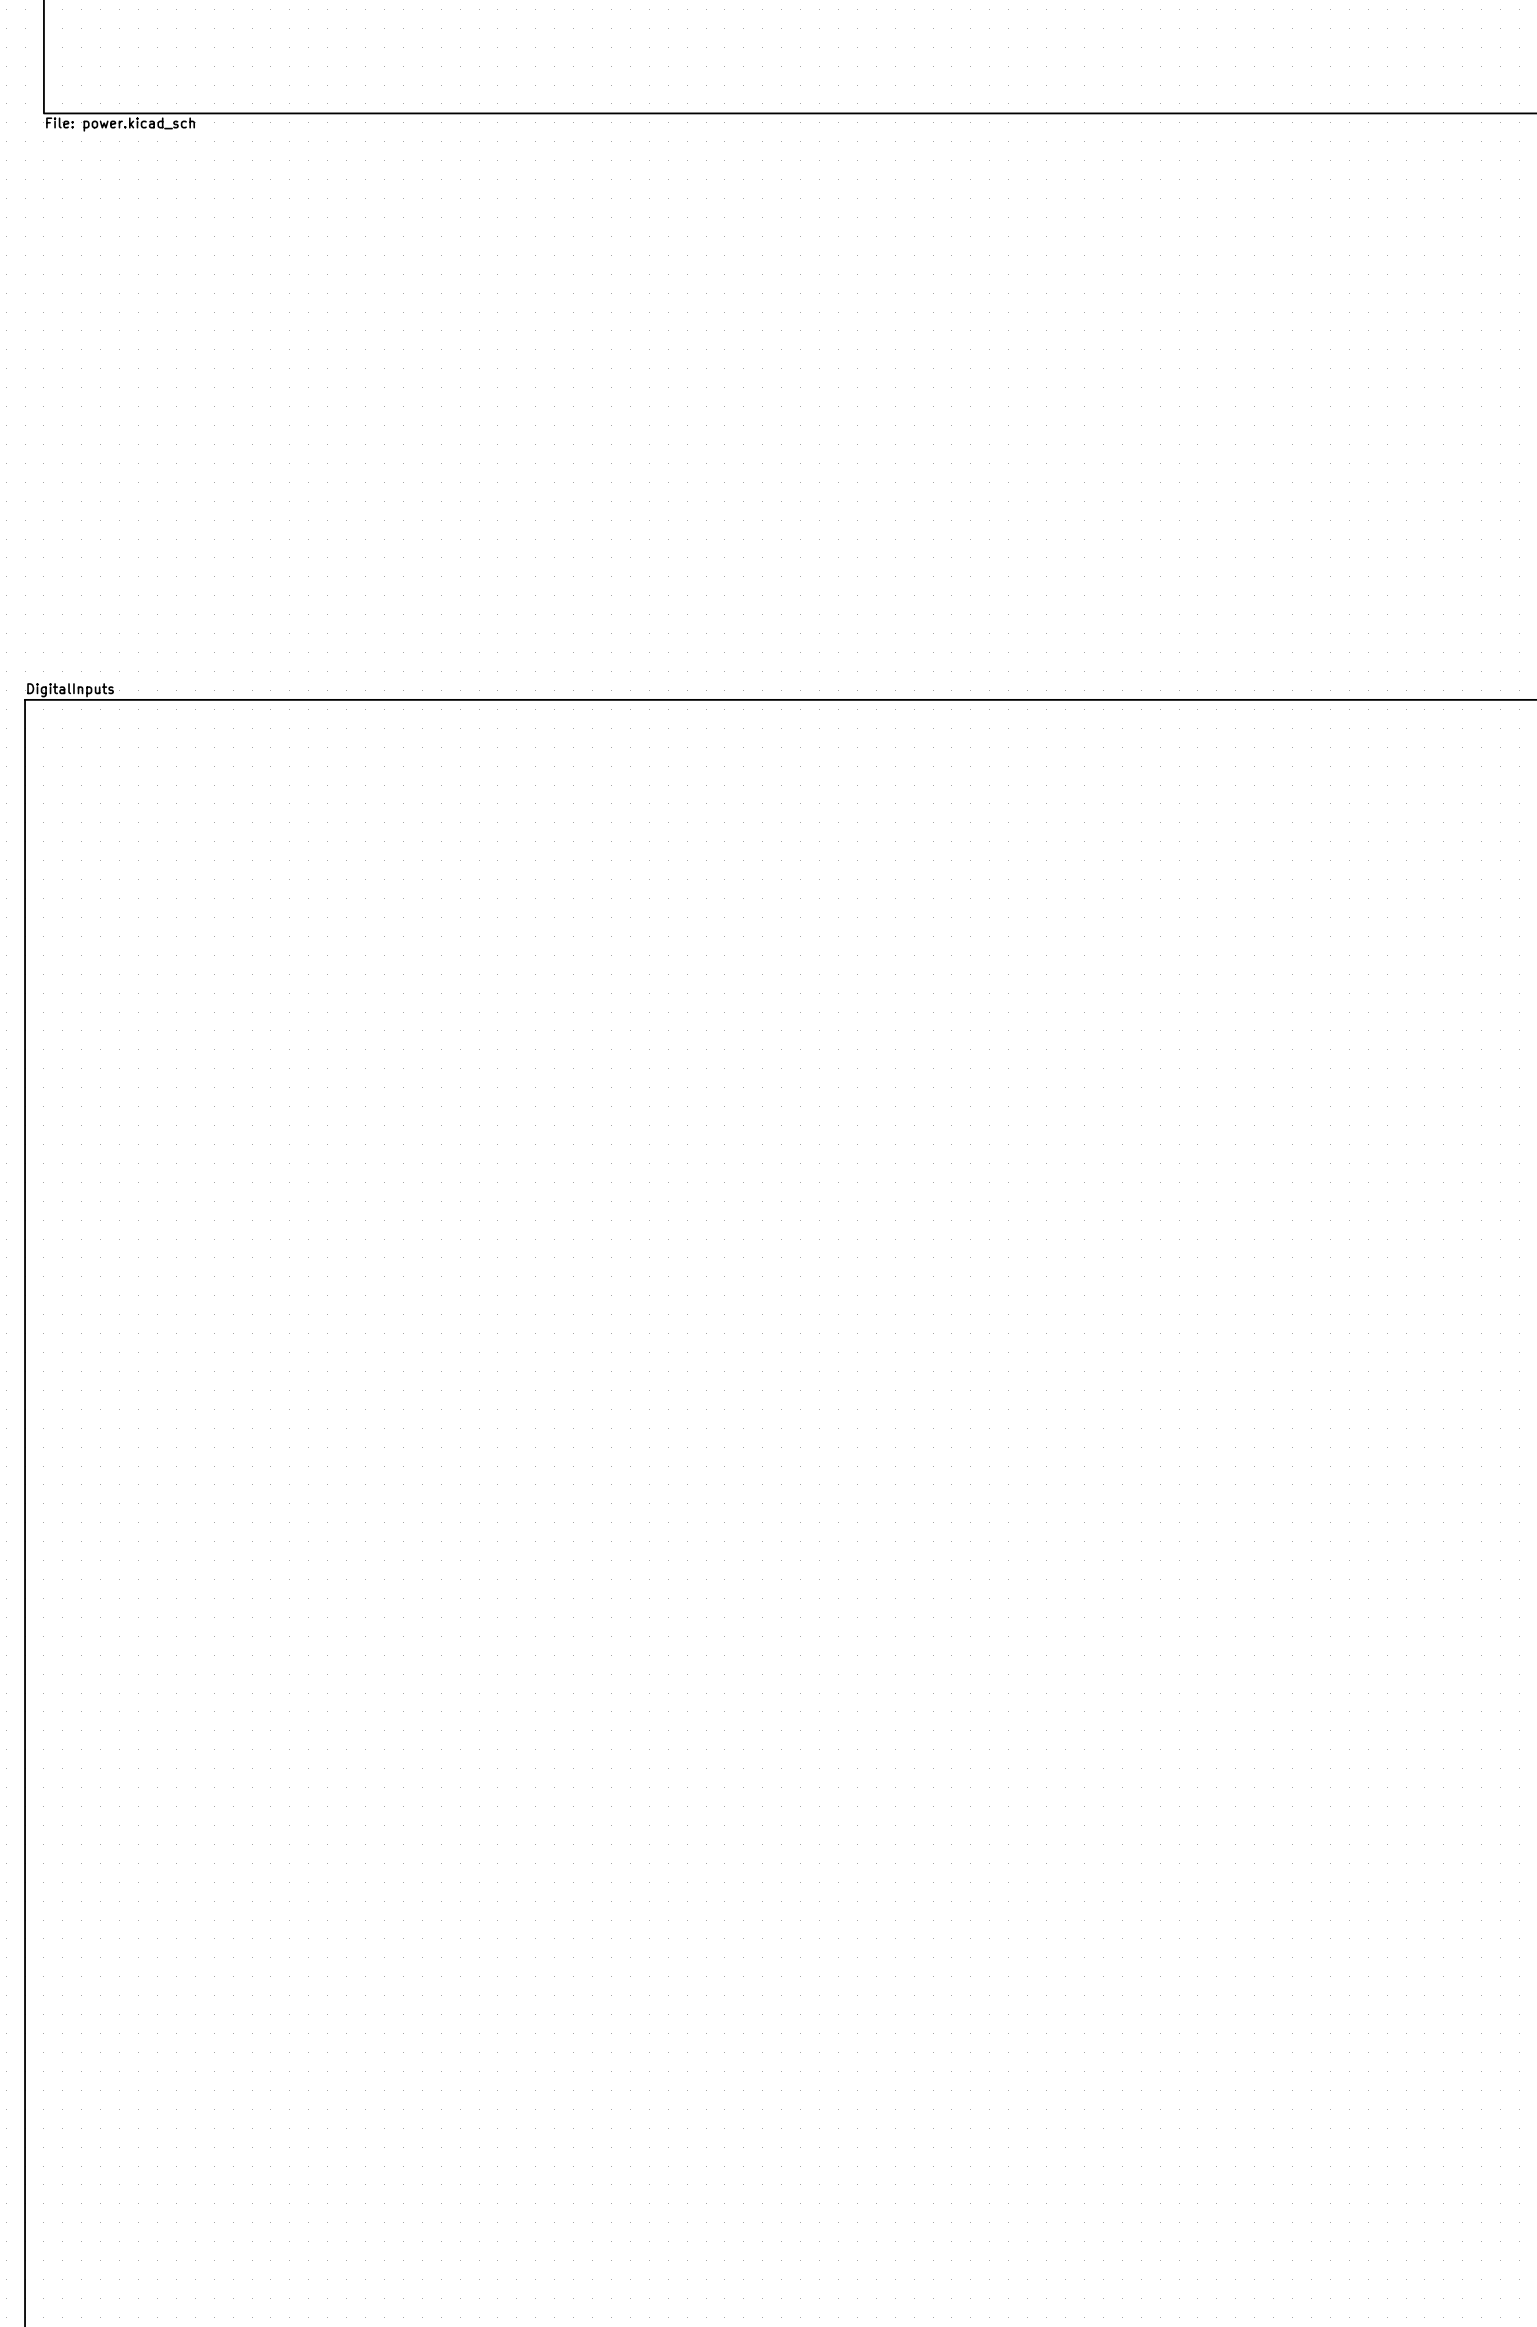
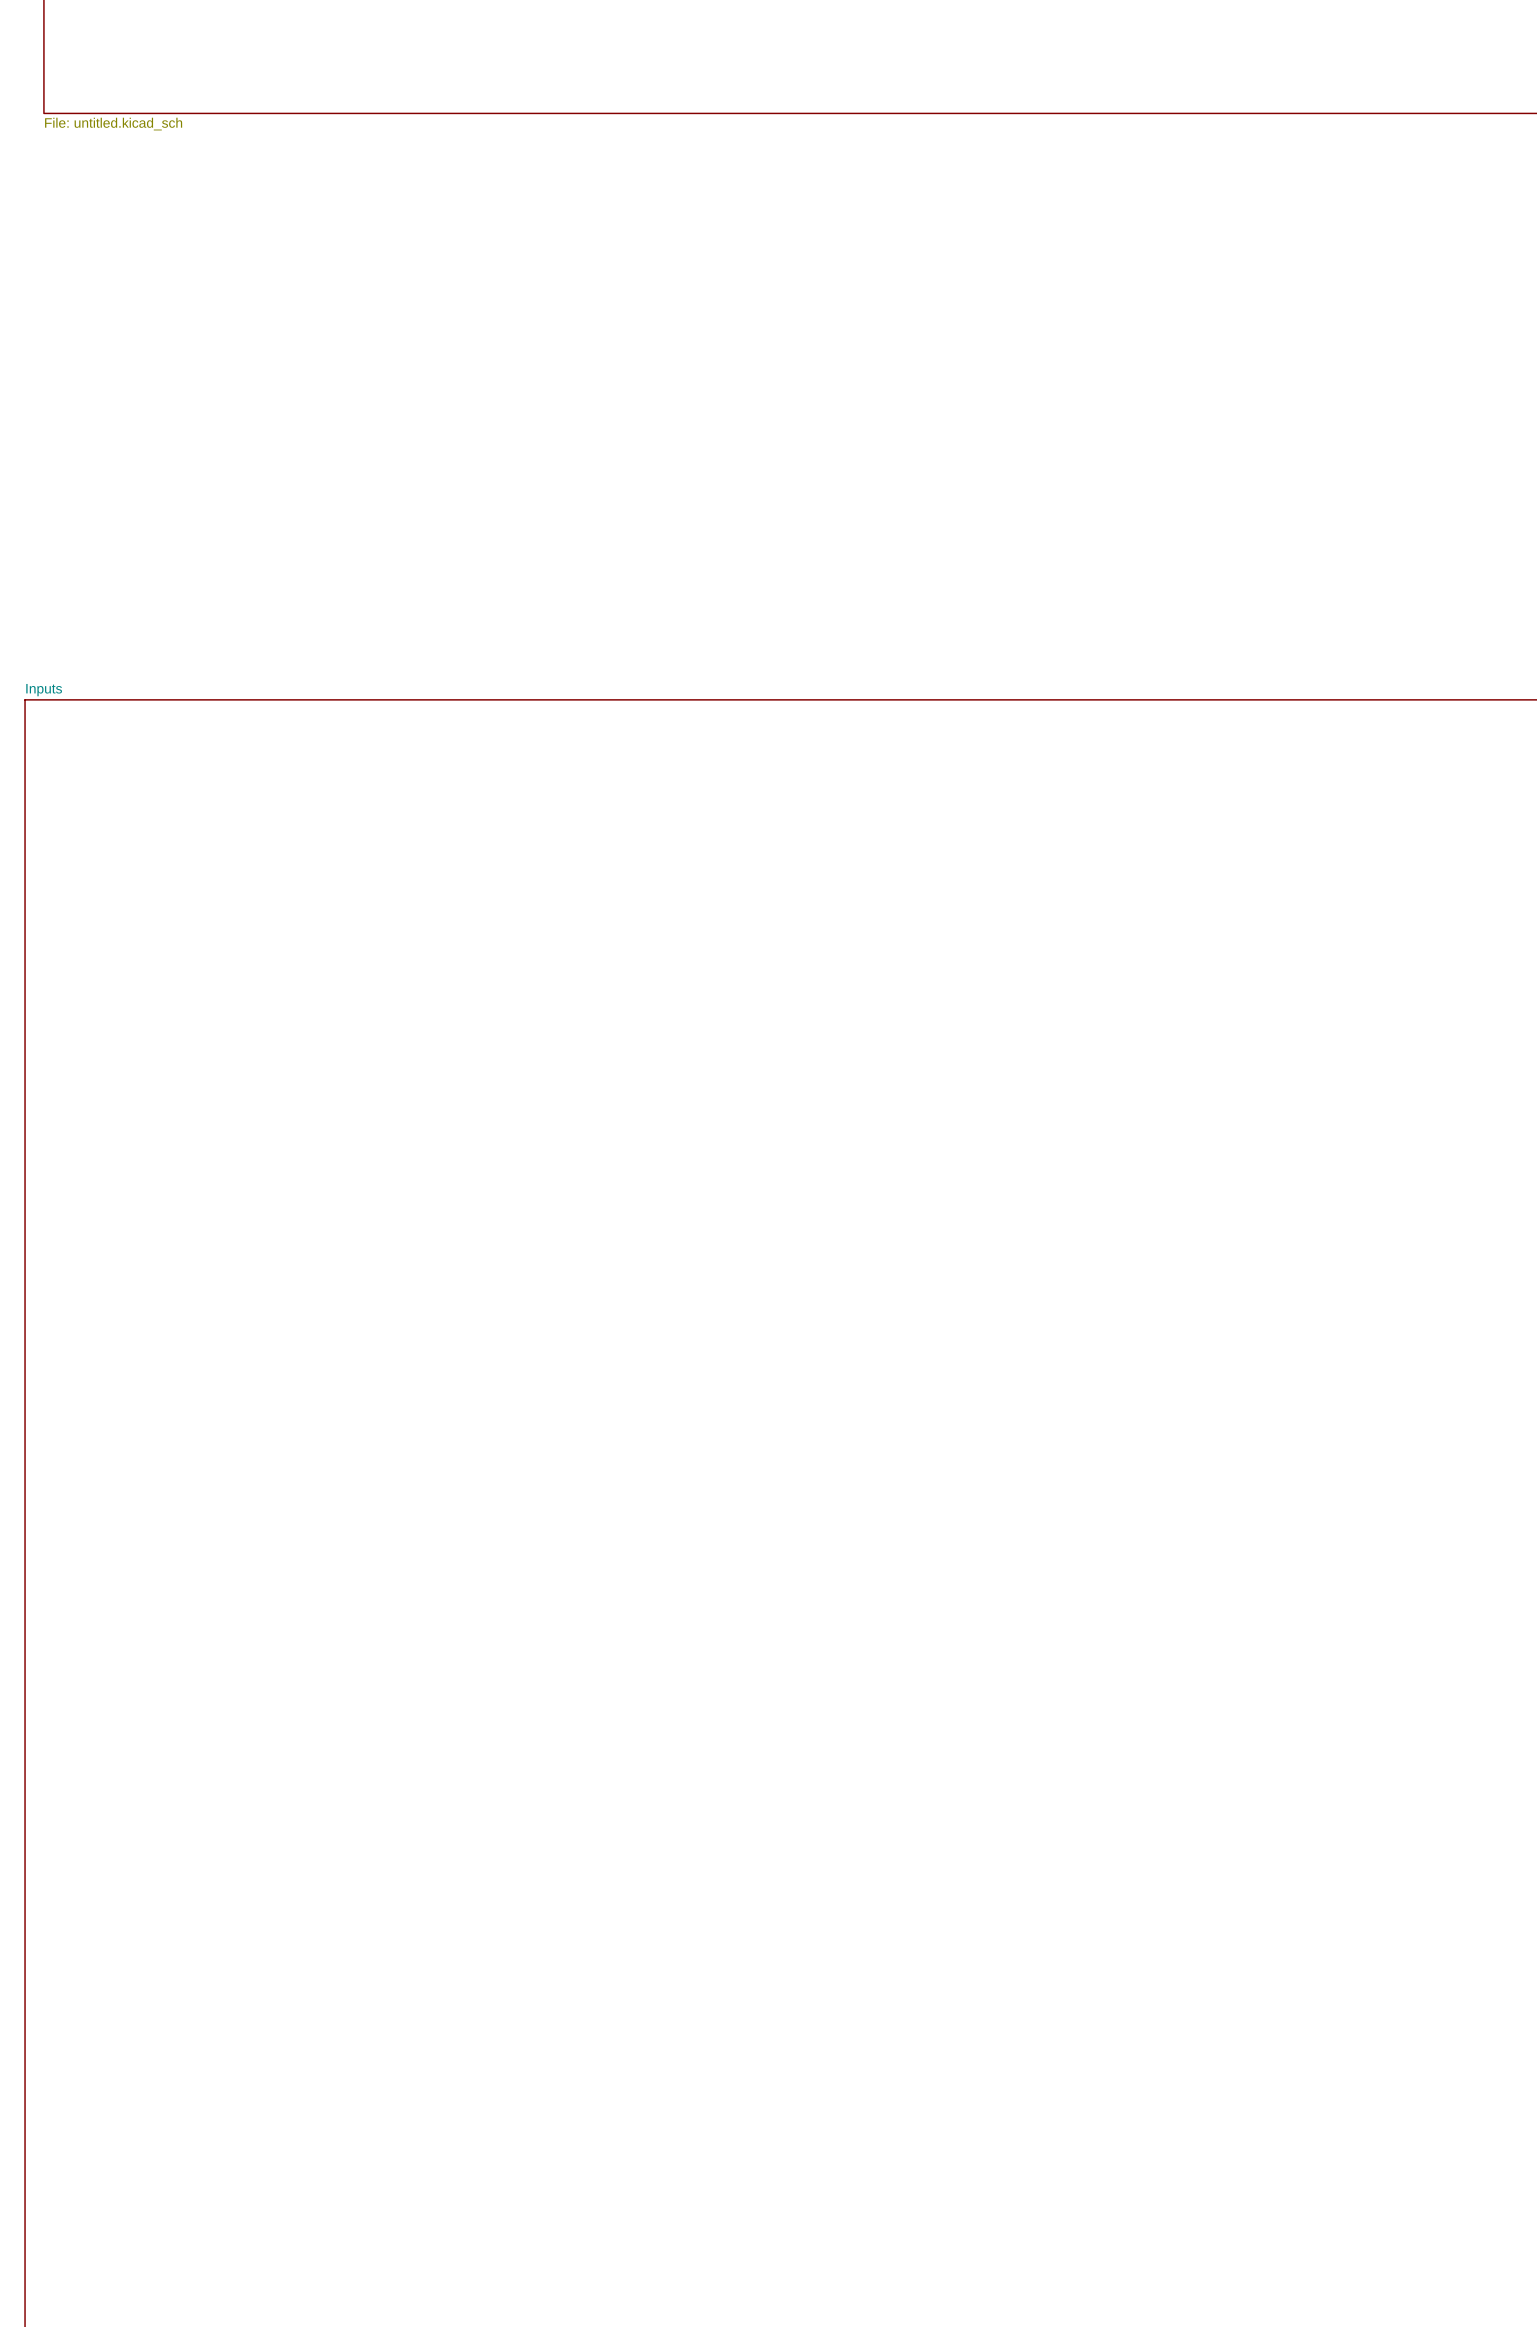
sheet value: File: power.kicad_sch (120, 124) -> File: untitled.kicad_sch (113, 124)
sheet DigitalInputs name: DigitalInputs (70, 690) -> Inputs (44, 690)

